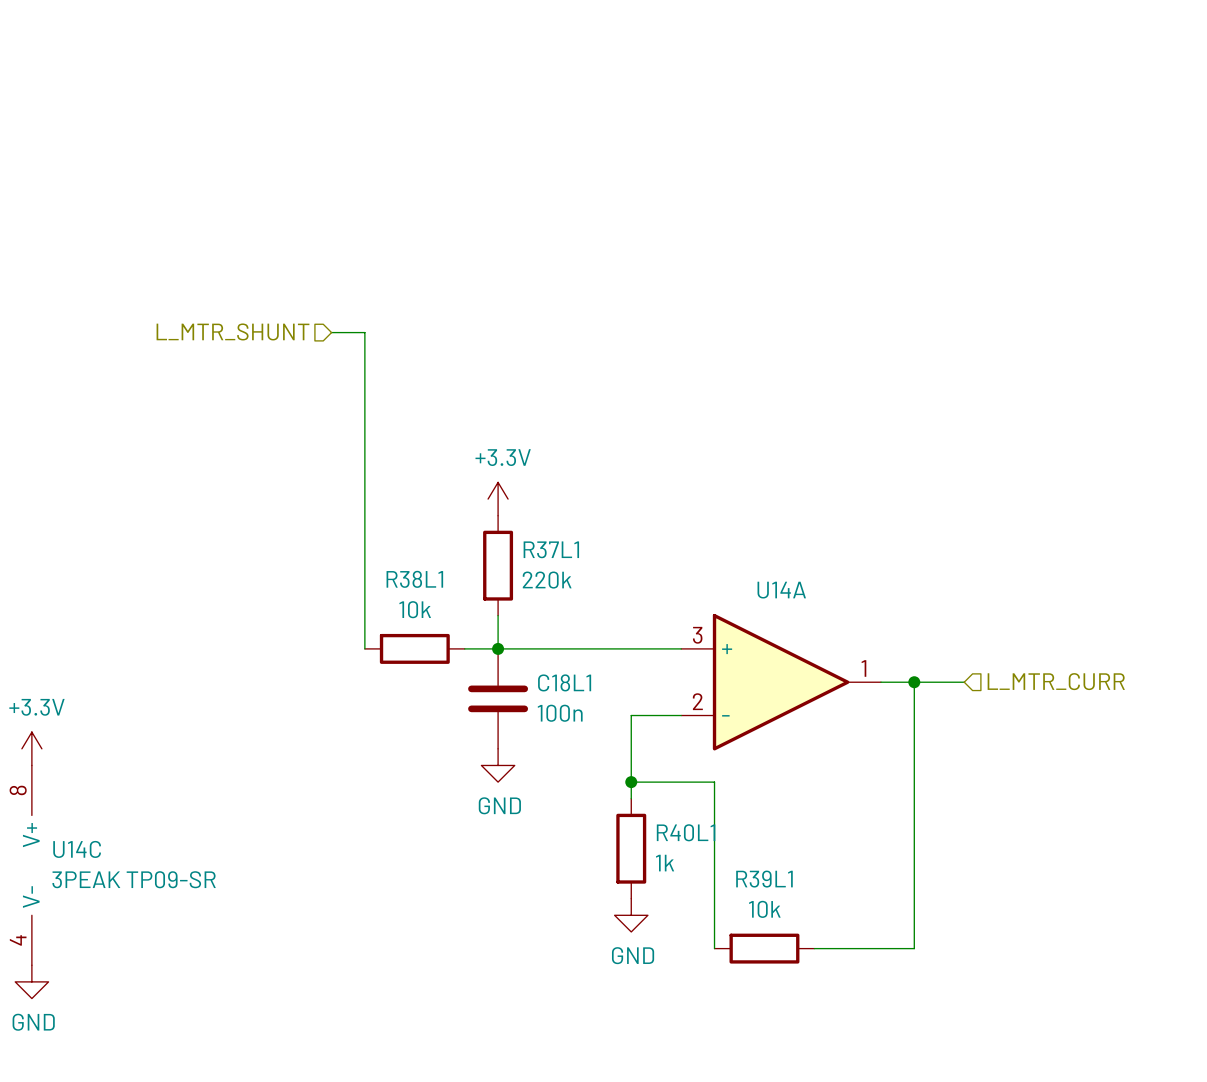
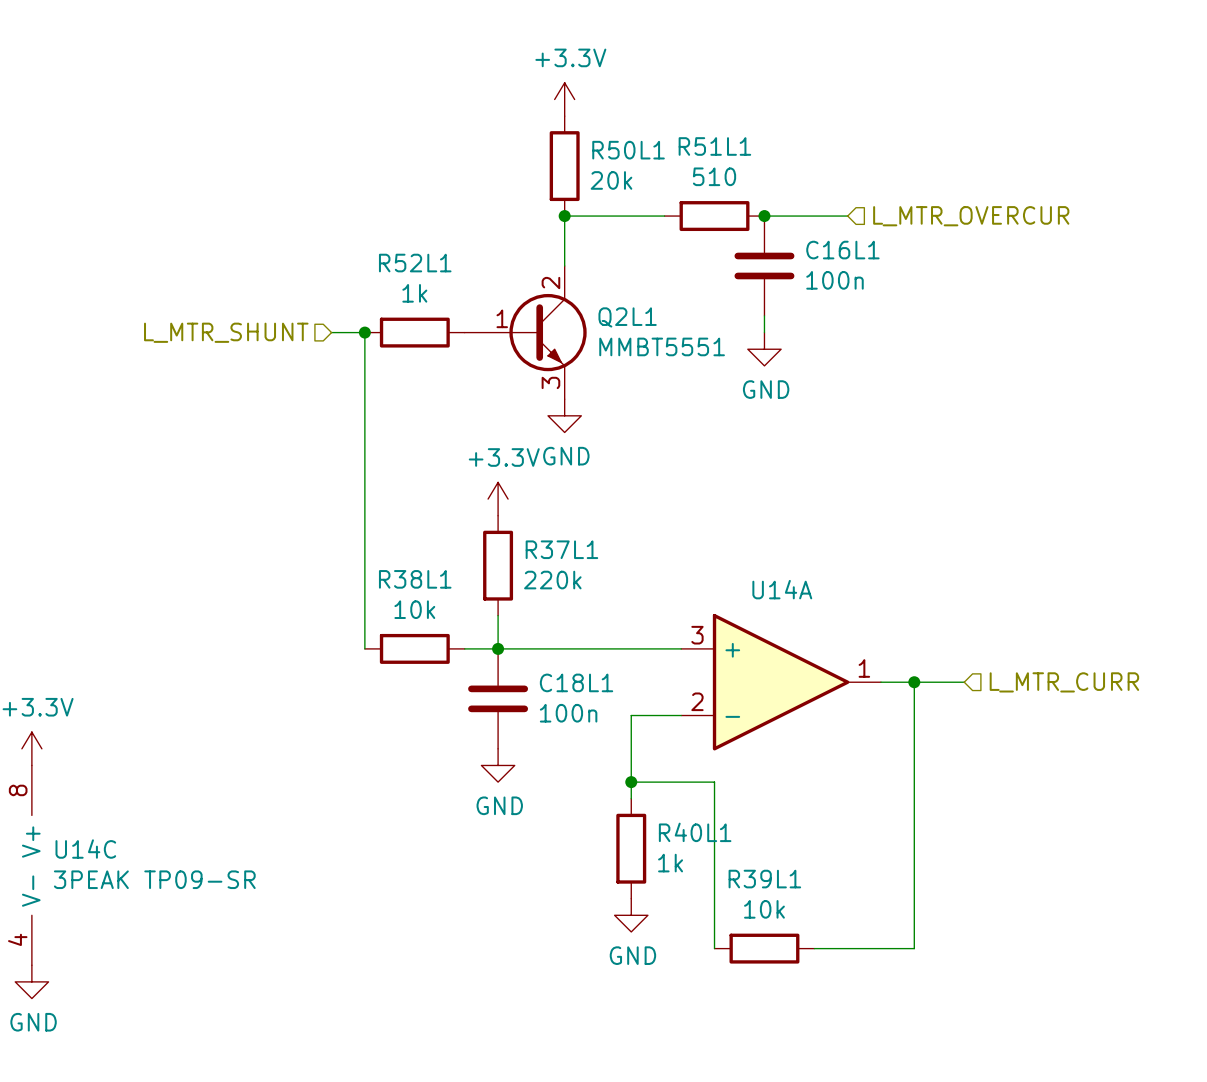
power symbol: none -> +3.3V (564, 99)
R50L1: none -> 20k (564, 166)
hierarchical label: none -> L_MTR_OVERCUR (971, 216)
junction: none -> (564, 216)
wire: none -> (664, 216) (564, 216) (564, 265)
R51L1: none -> 510 (714, 216)
wire: none -> (764, 216) (847, 216)
junction: none -> (764, 216)
C16L1: none -> 100n (764, 265)
wire: none -> (764, 315) (764, 332)
junction: none -> (364, 332)
R52L1: none -> 1k (414, 332)
Q2L1: none -> MMBT5551 (525, 332)
power symbol: none -> GND (764, 349)
power symbol: none -> GND (564, 415)

